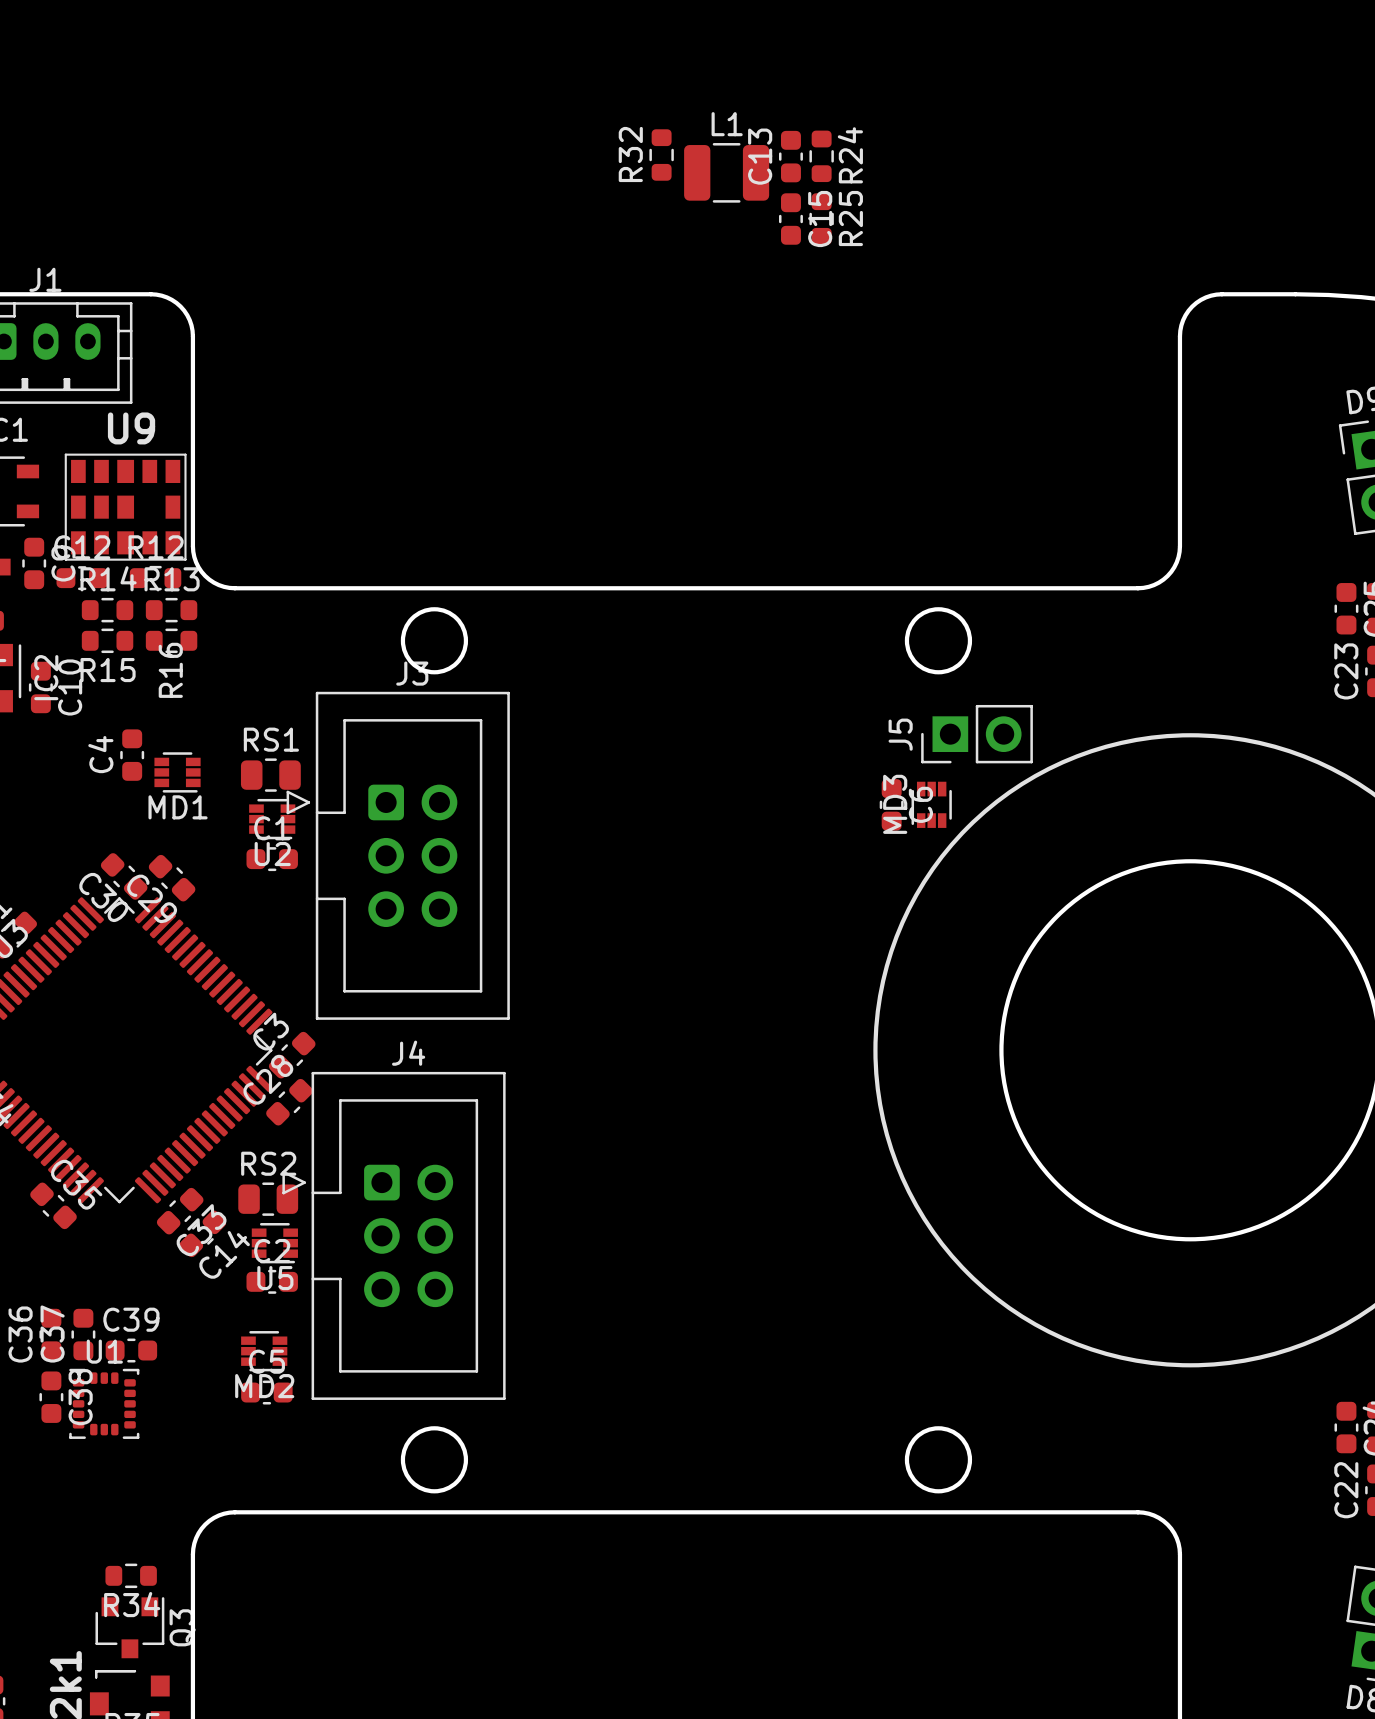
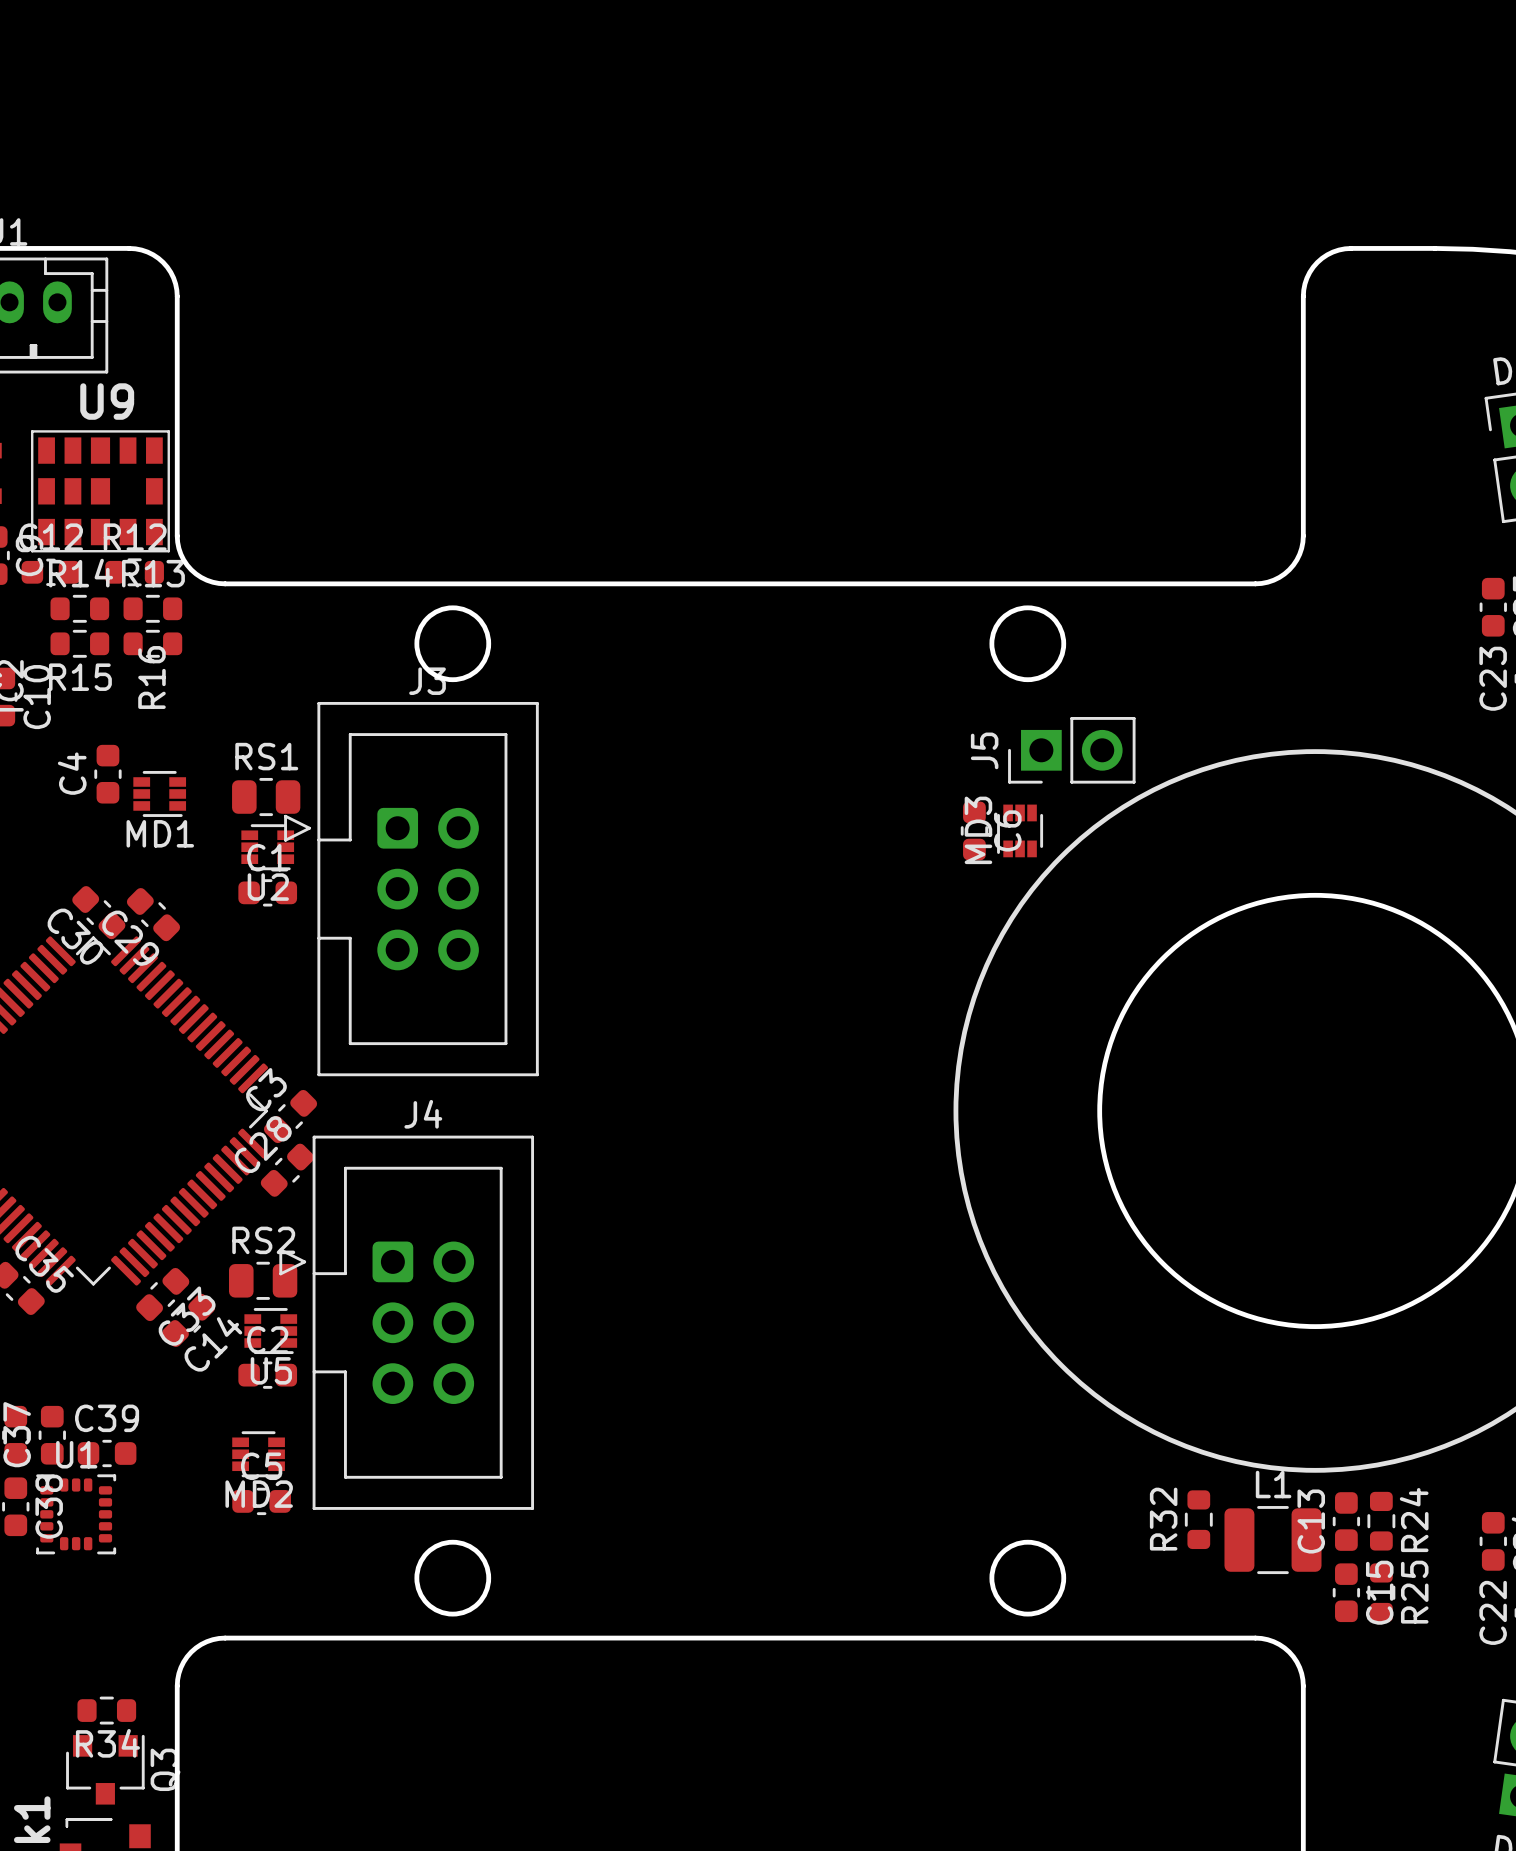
R32 position: (661, 154) -> (1198, 1519)
C13 position: (790, 156) -> (1346, 1521)
R24 position: (821, 156) -> (1381, 1521)
L1 position: (726, 172) -> (1272, 1540)
C15 position: (790, 219) -> (1346, 1592)
R25 position: (821, 219) -> (1381, 1592)

